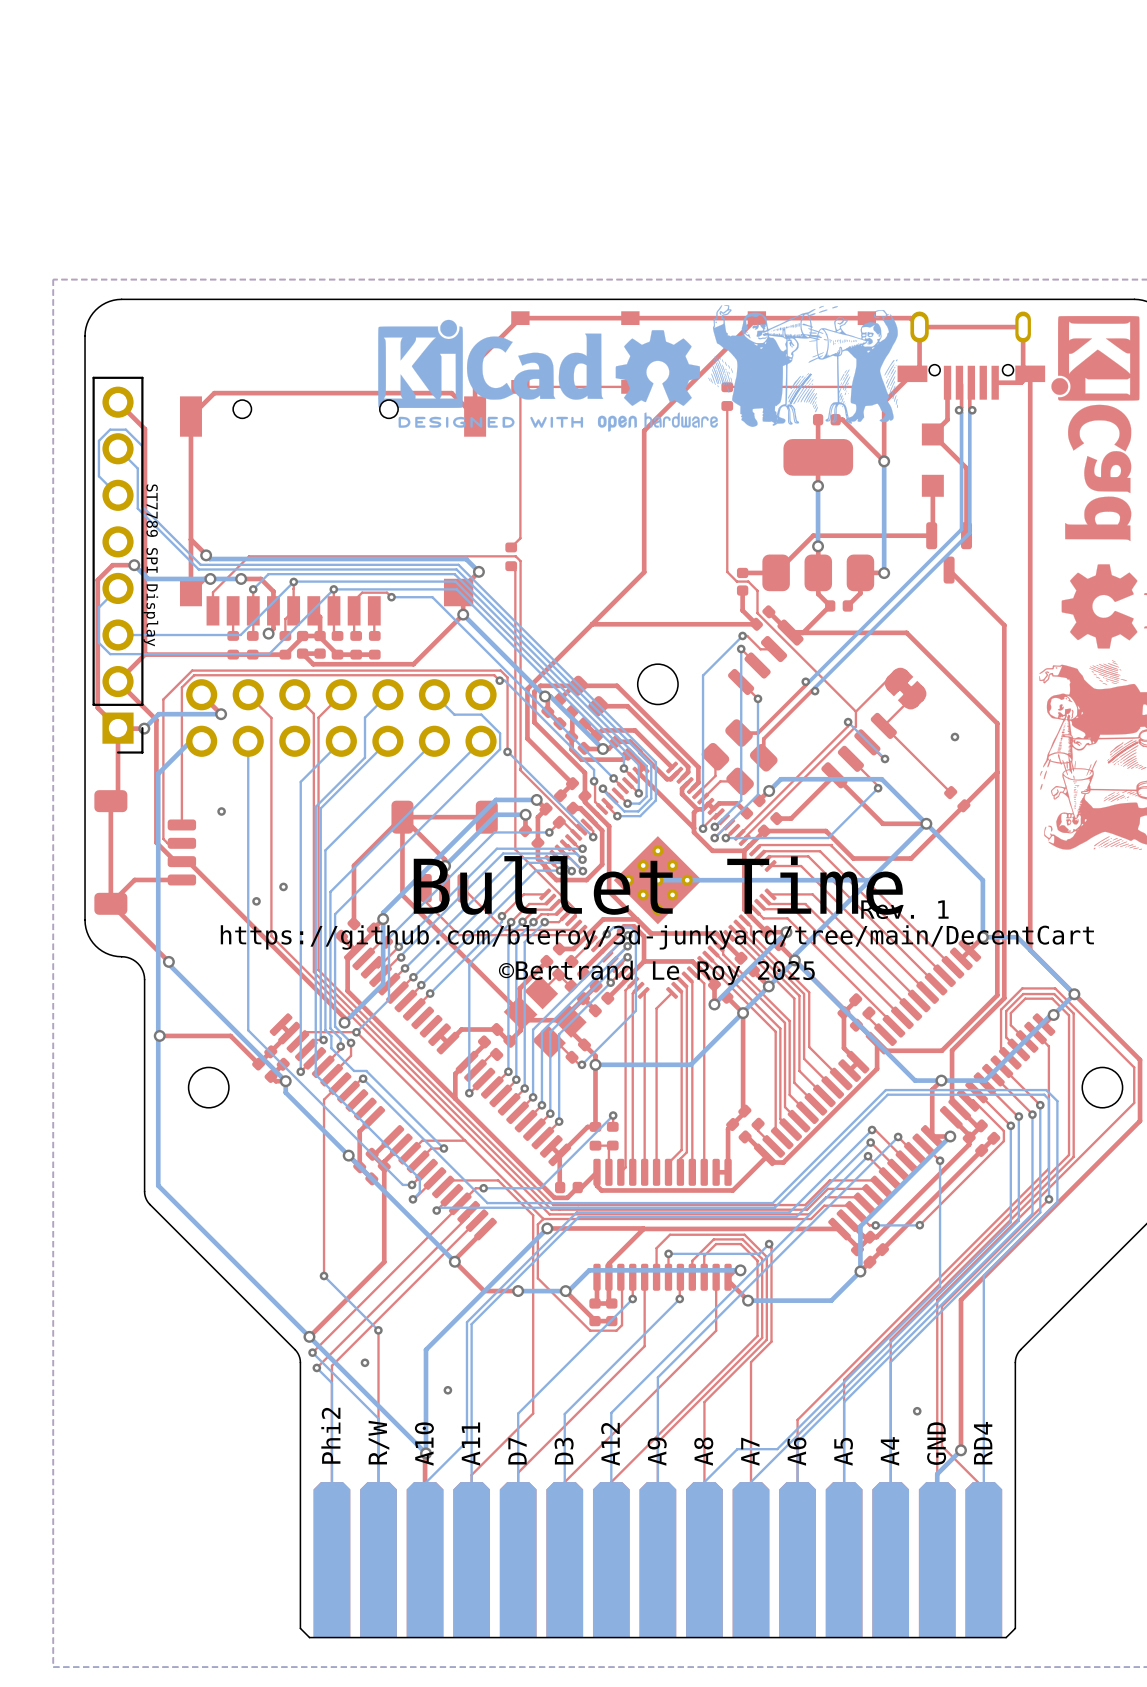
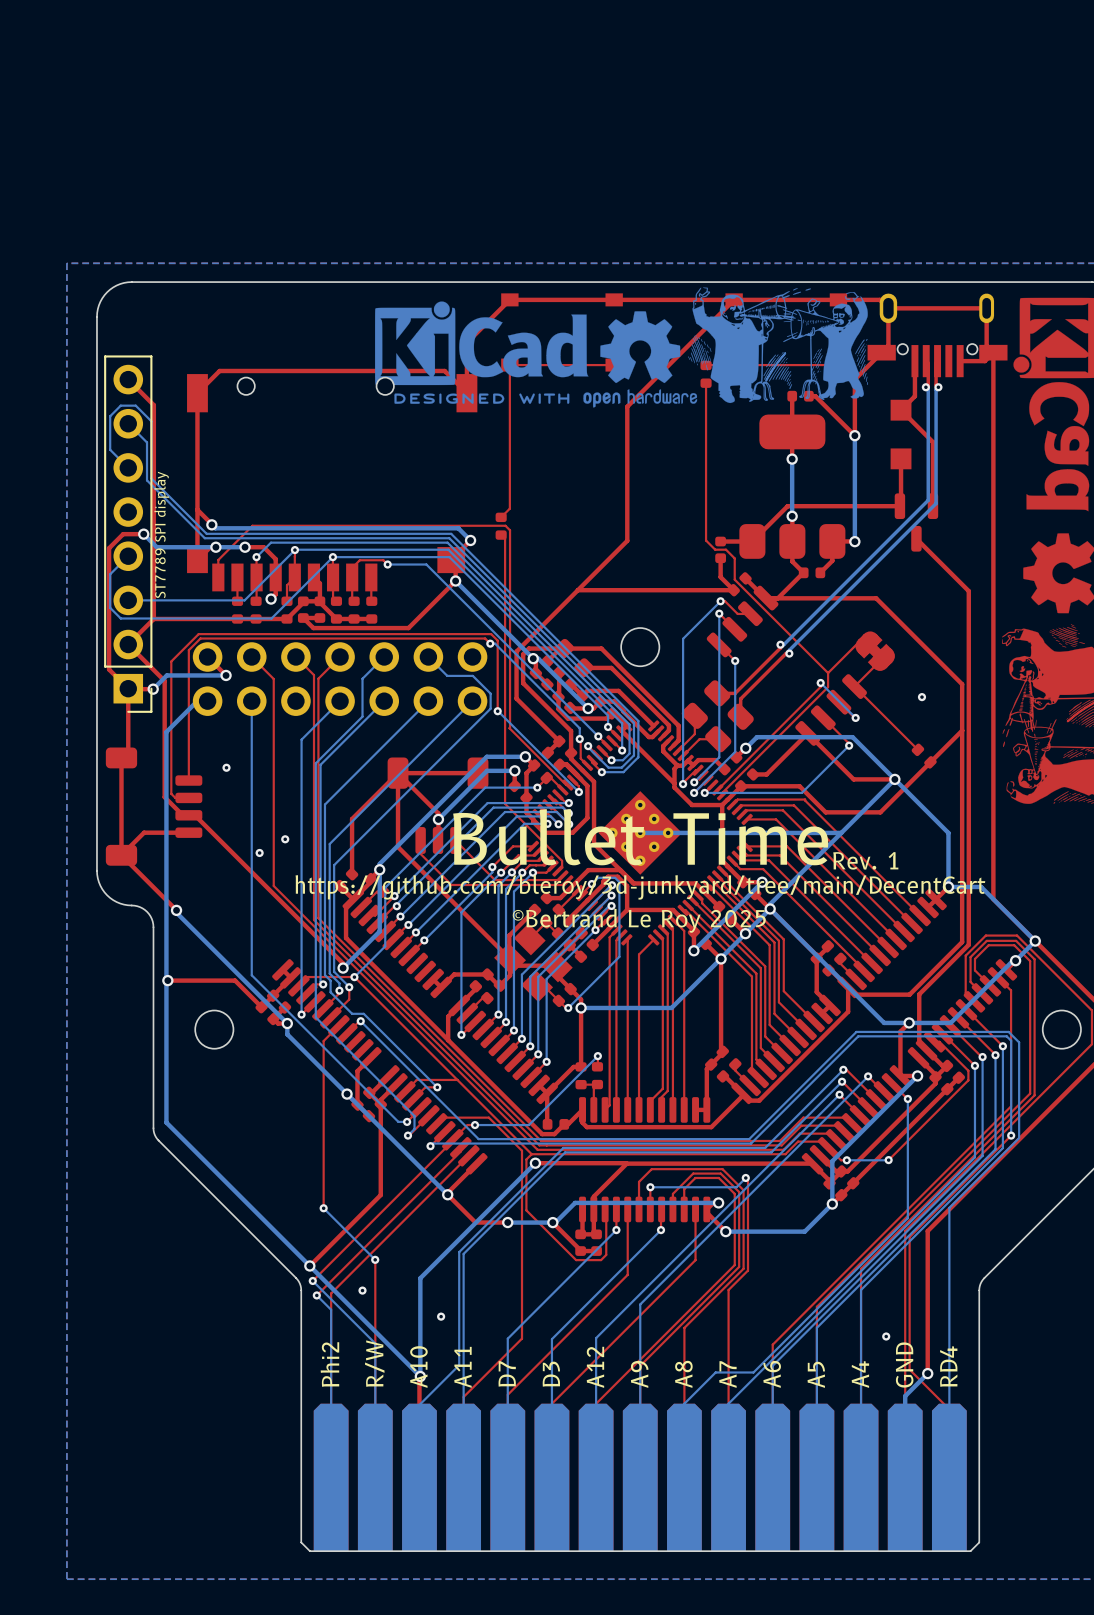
ST7789 SPI Display name: ST7789 SPI Display (150, 565) -> none
text: none -> ST7789 SPI display (161, 534)

